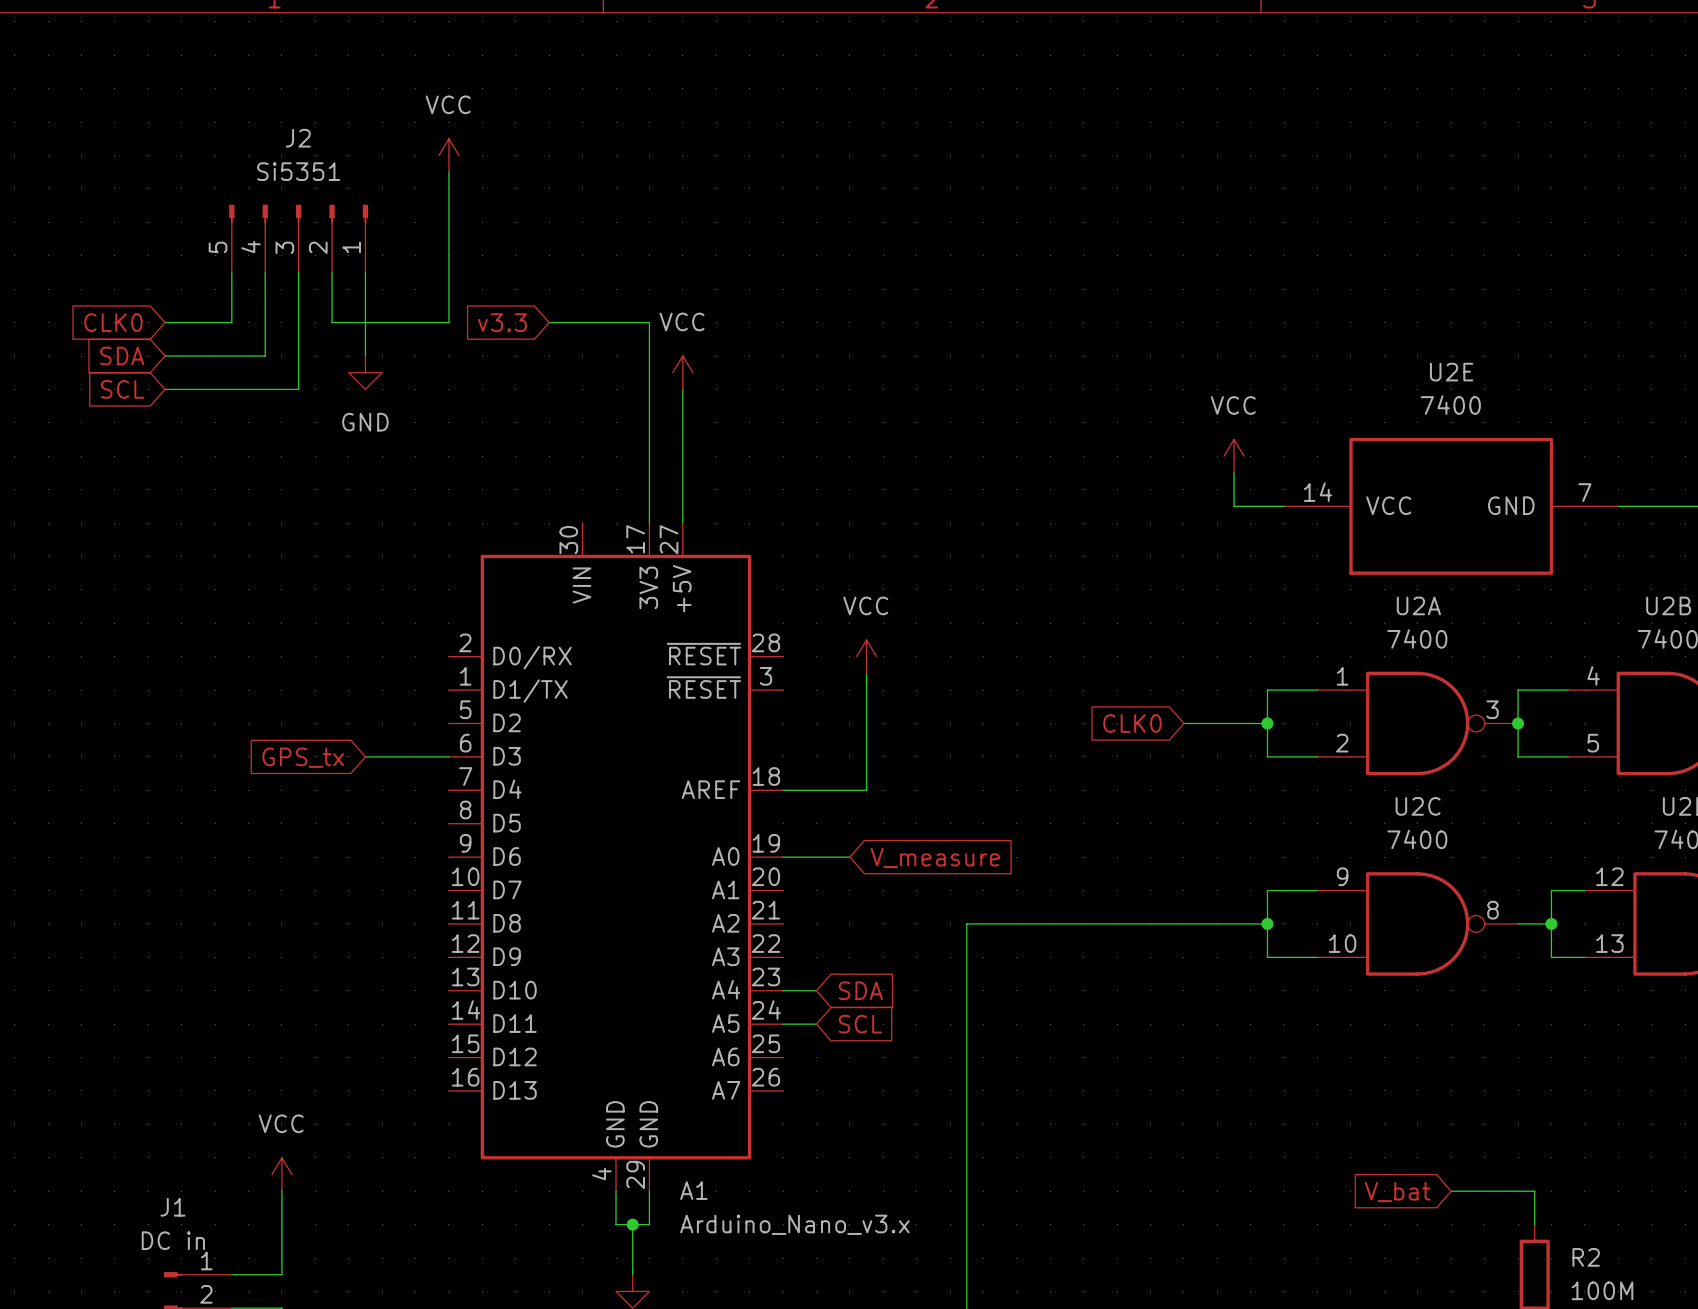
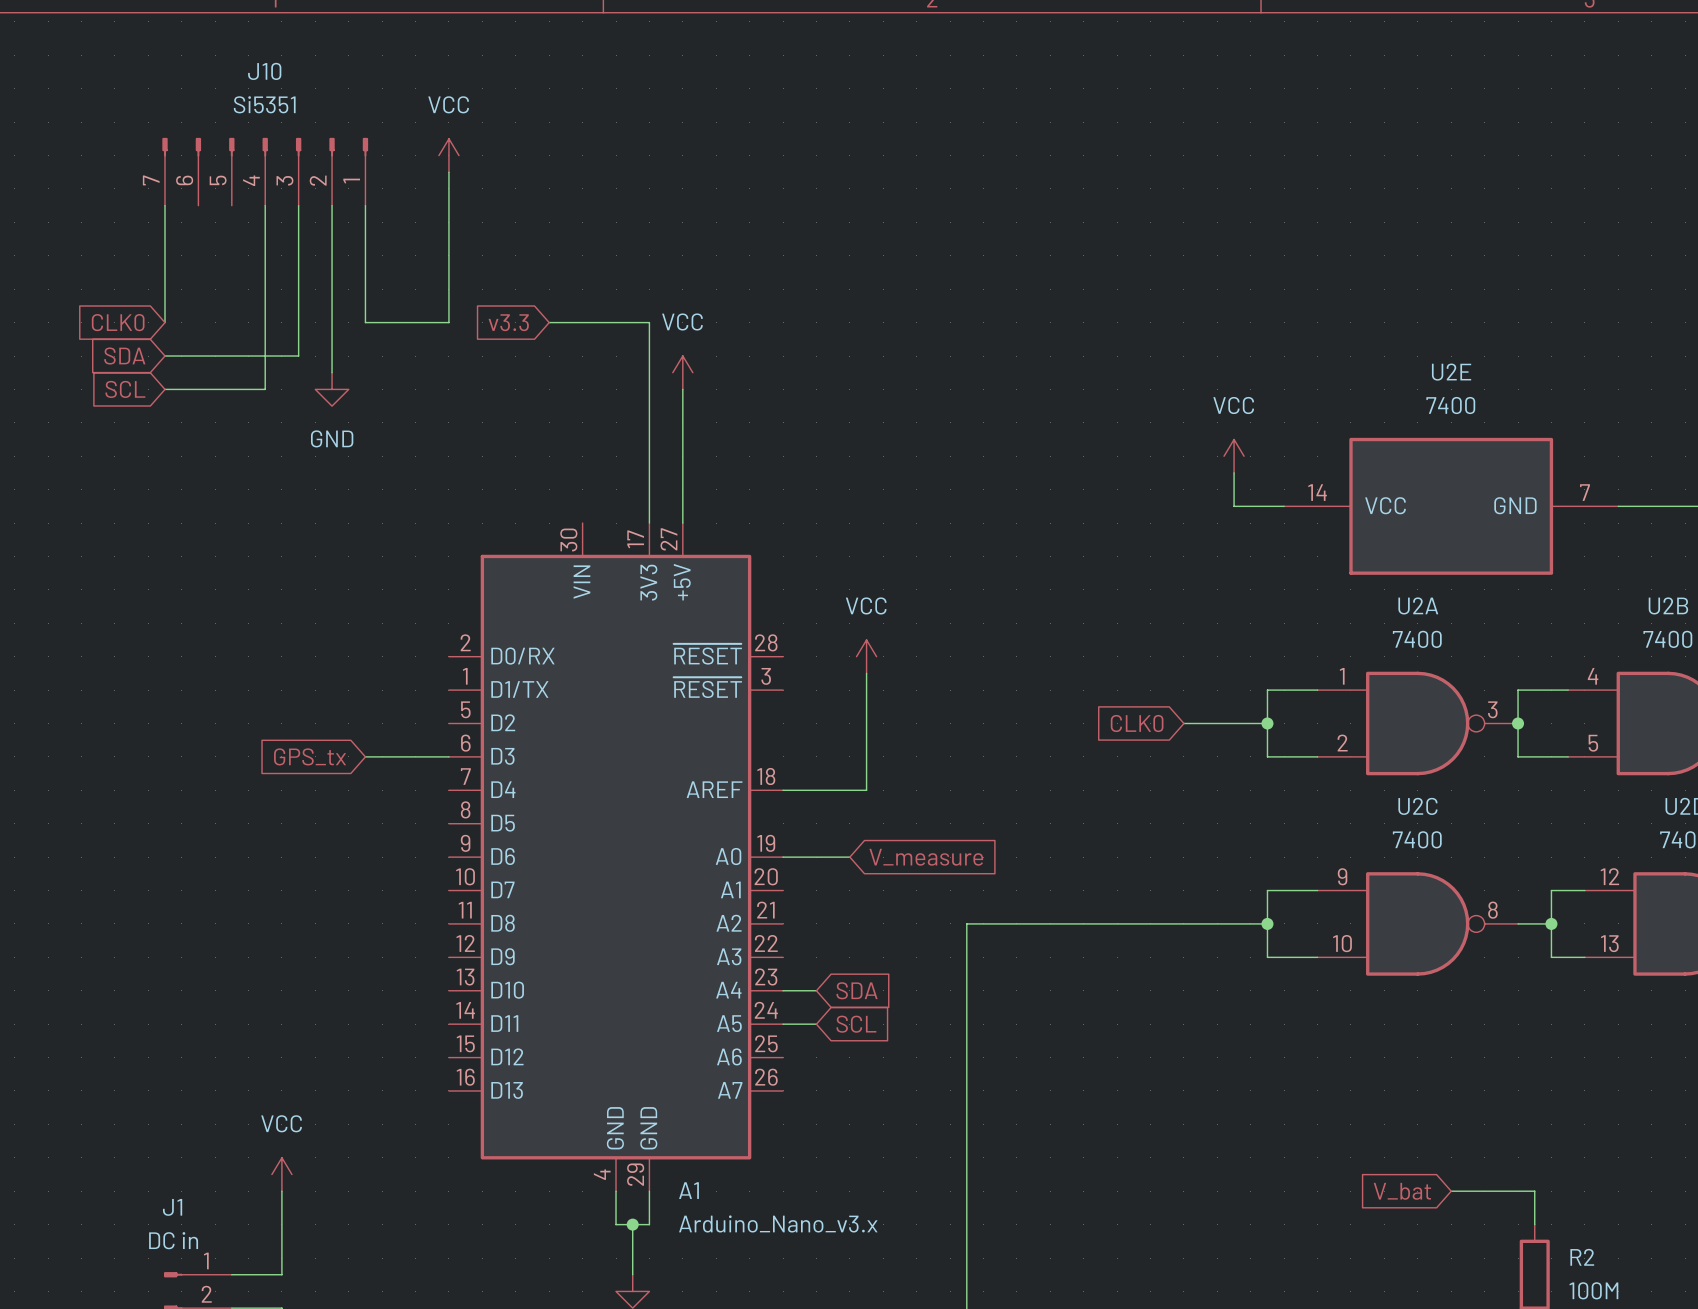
J10: none -> Si5351 (265, 171)
J2: Si5351 (298, 238) -> none
wire: (231, 272) (231, 322) (164, 322) -> (164, 205) (164, 322)
wire: (332, 322) (365, 322) (365, 356) -> (332, 322) (332, 372)
wire: (298, 356) (298, 389) (265, 389) -> (298, 356) (265, 356) (265, 389)
power symbol position: GND (365, 372) -> GND (332, 389)

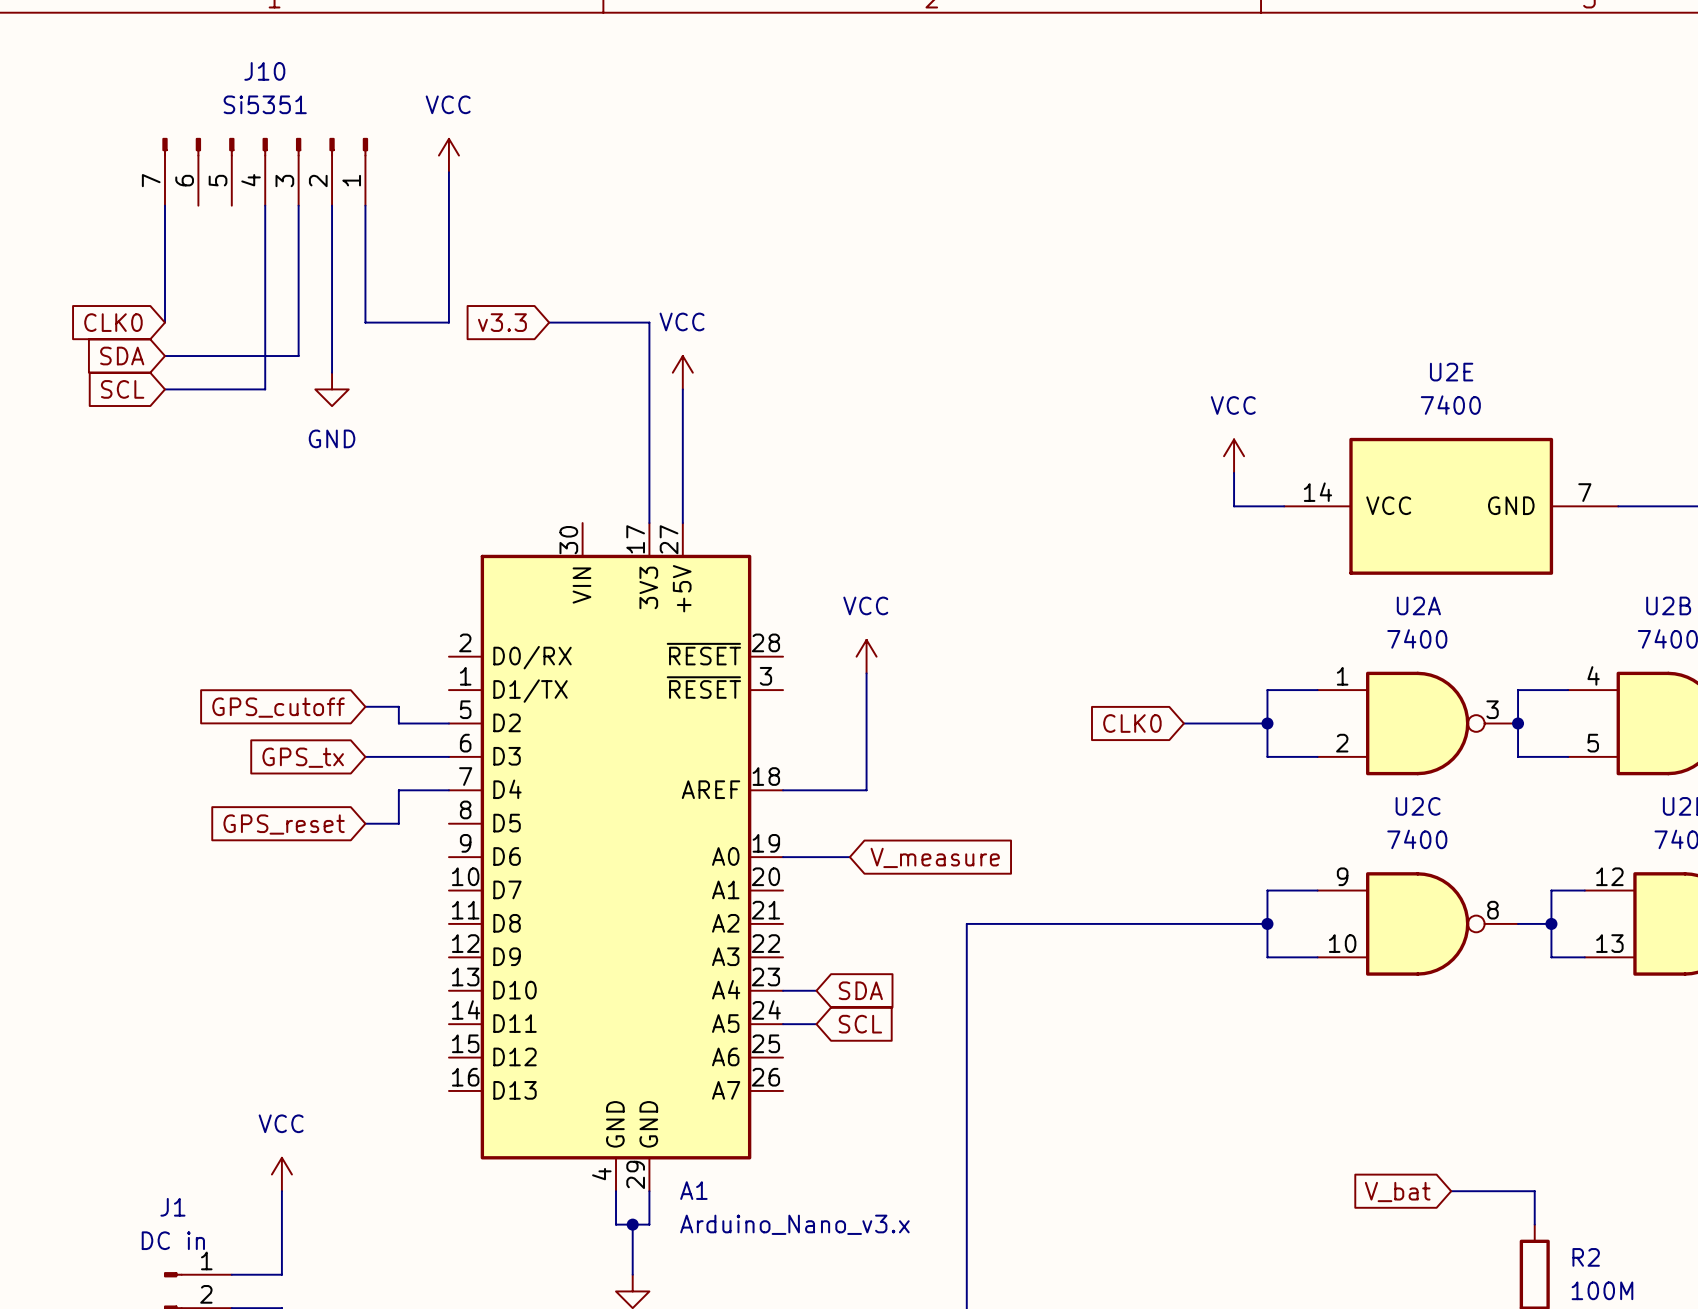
global label: none -> GPS_cutoff (278, 707)
wire: none -> (365, 706) (398, 706) (398, 723) (448, 723)
wire: none -> (448, 790) (398, 790) (398, 823) (365, 823)
global label: none -> GPS_reset (284, 824)

